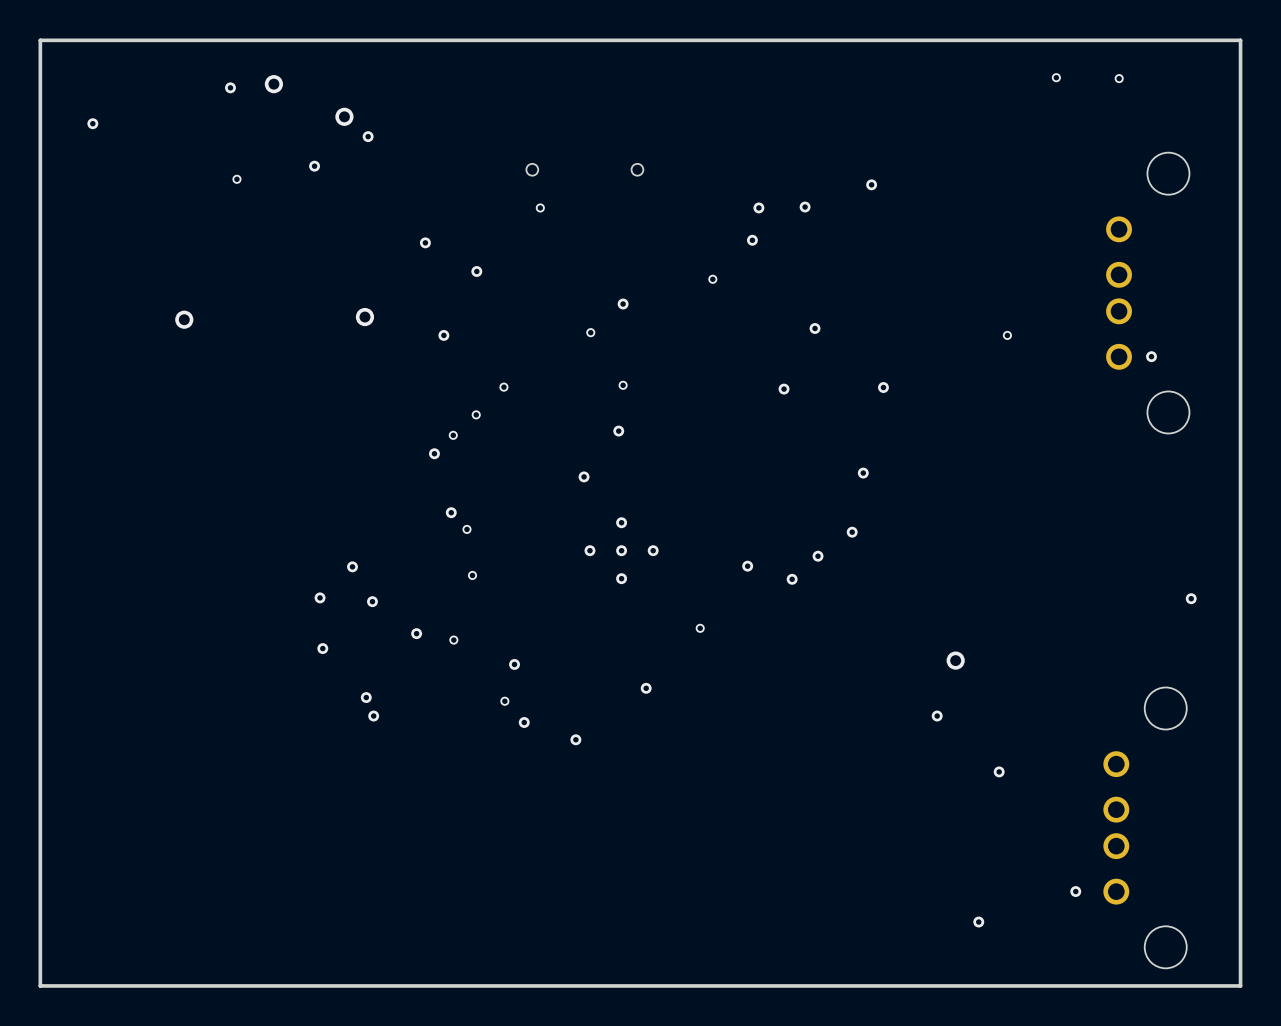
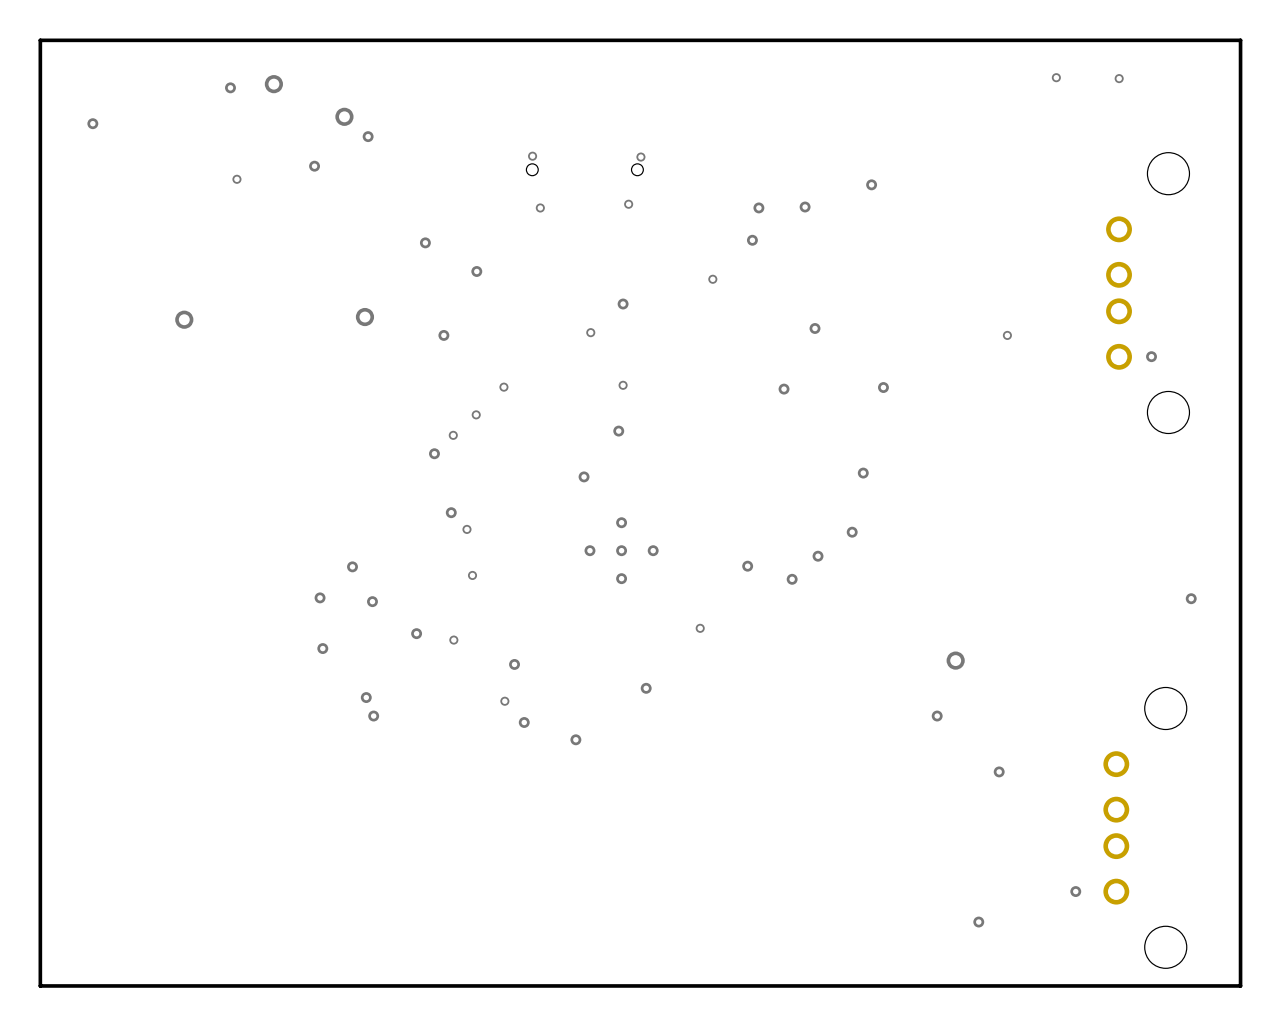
via: none -> (532, 156)
via: none -> (640, 157)
via: none -> (628, 204)

